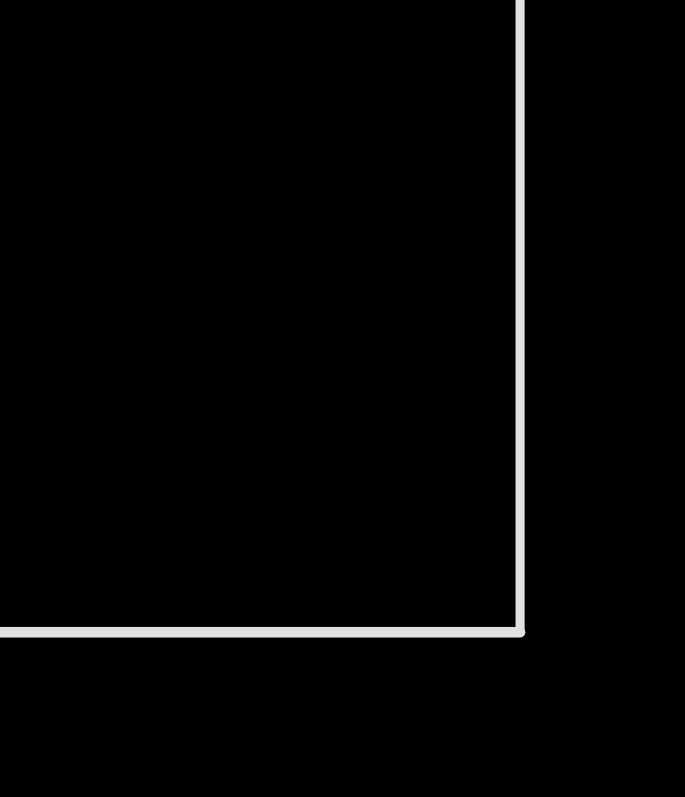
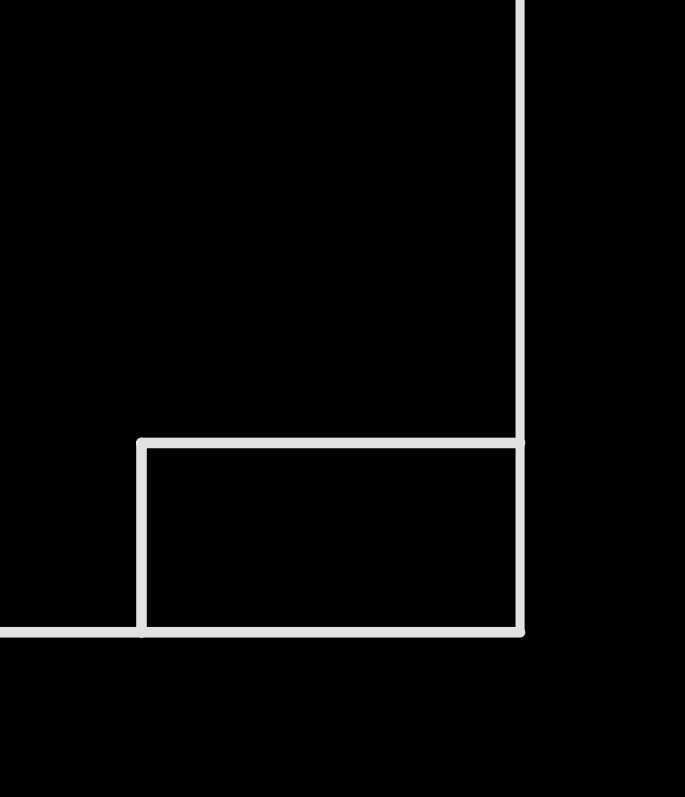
line: none -> (520, 442) (141, 442) (141, 632)

